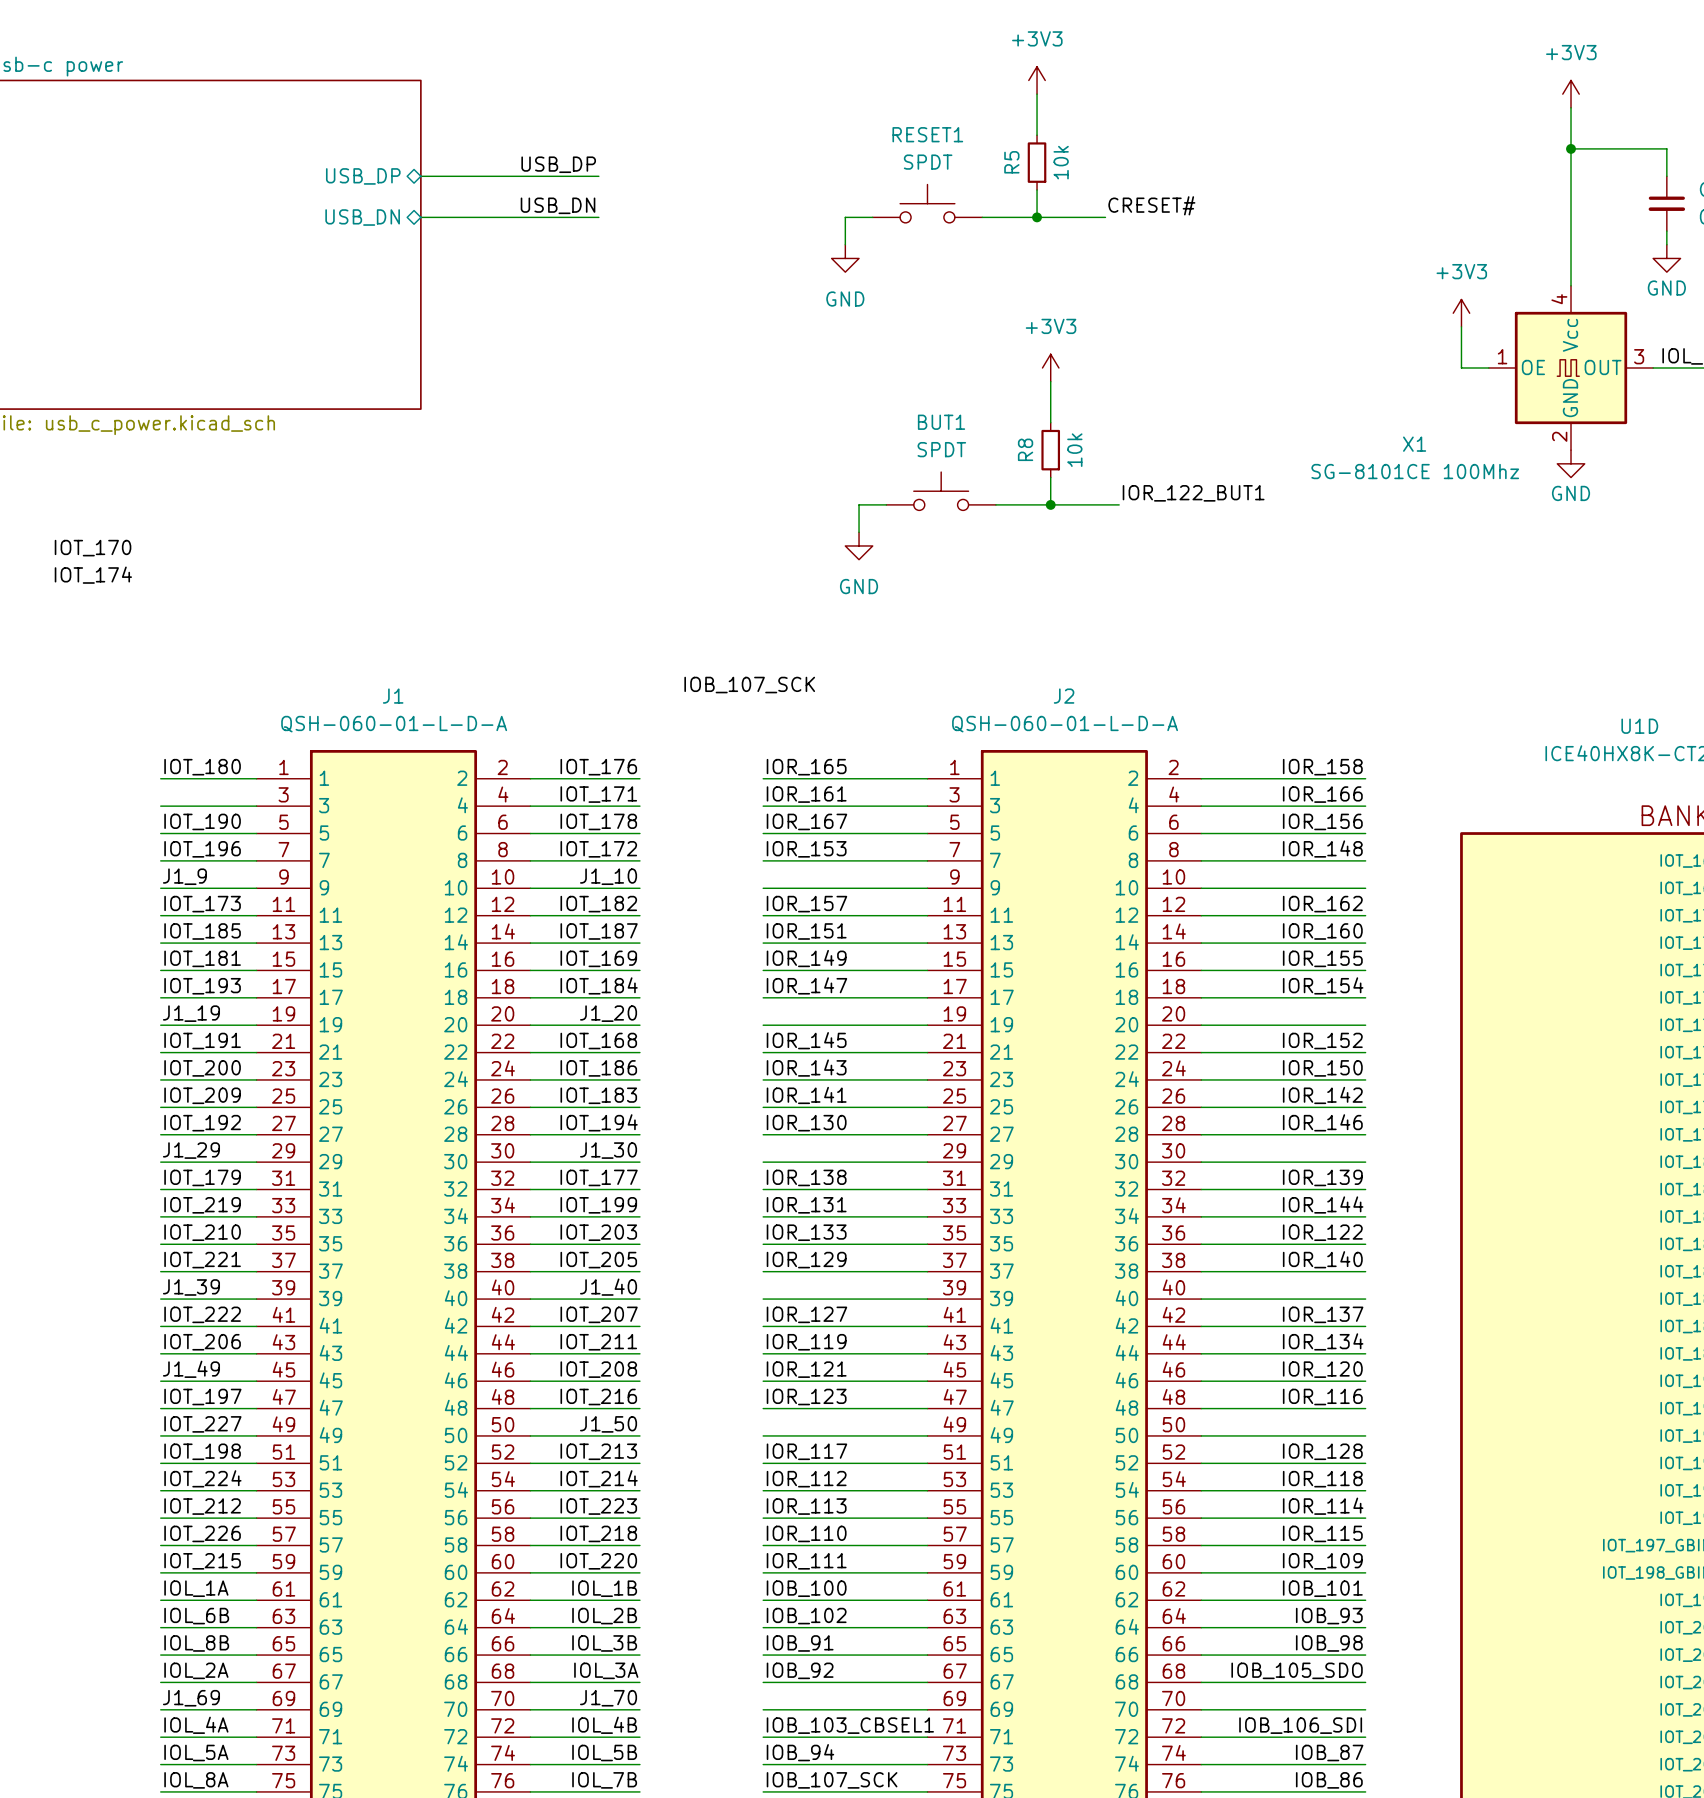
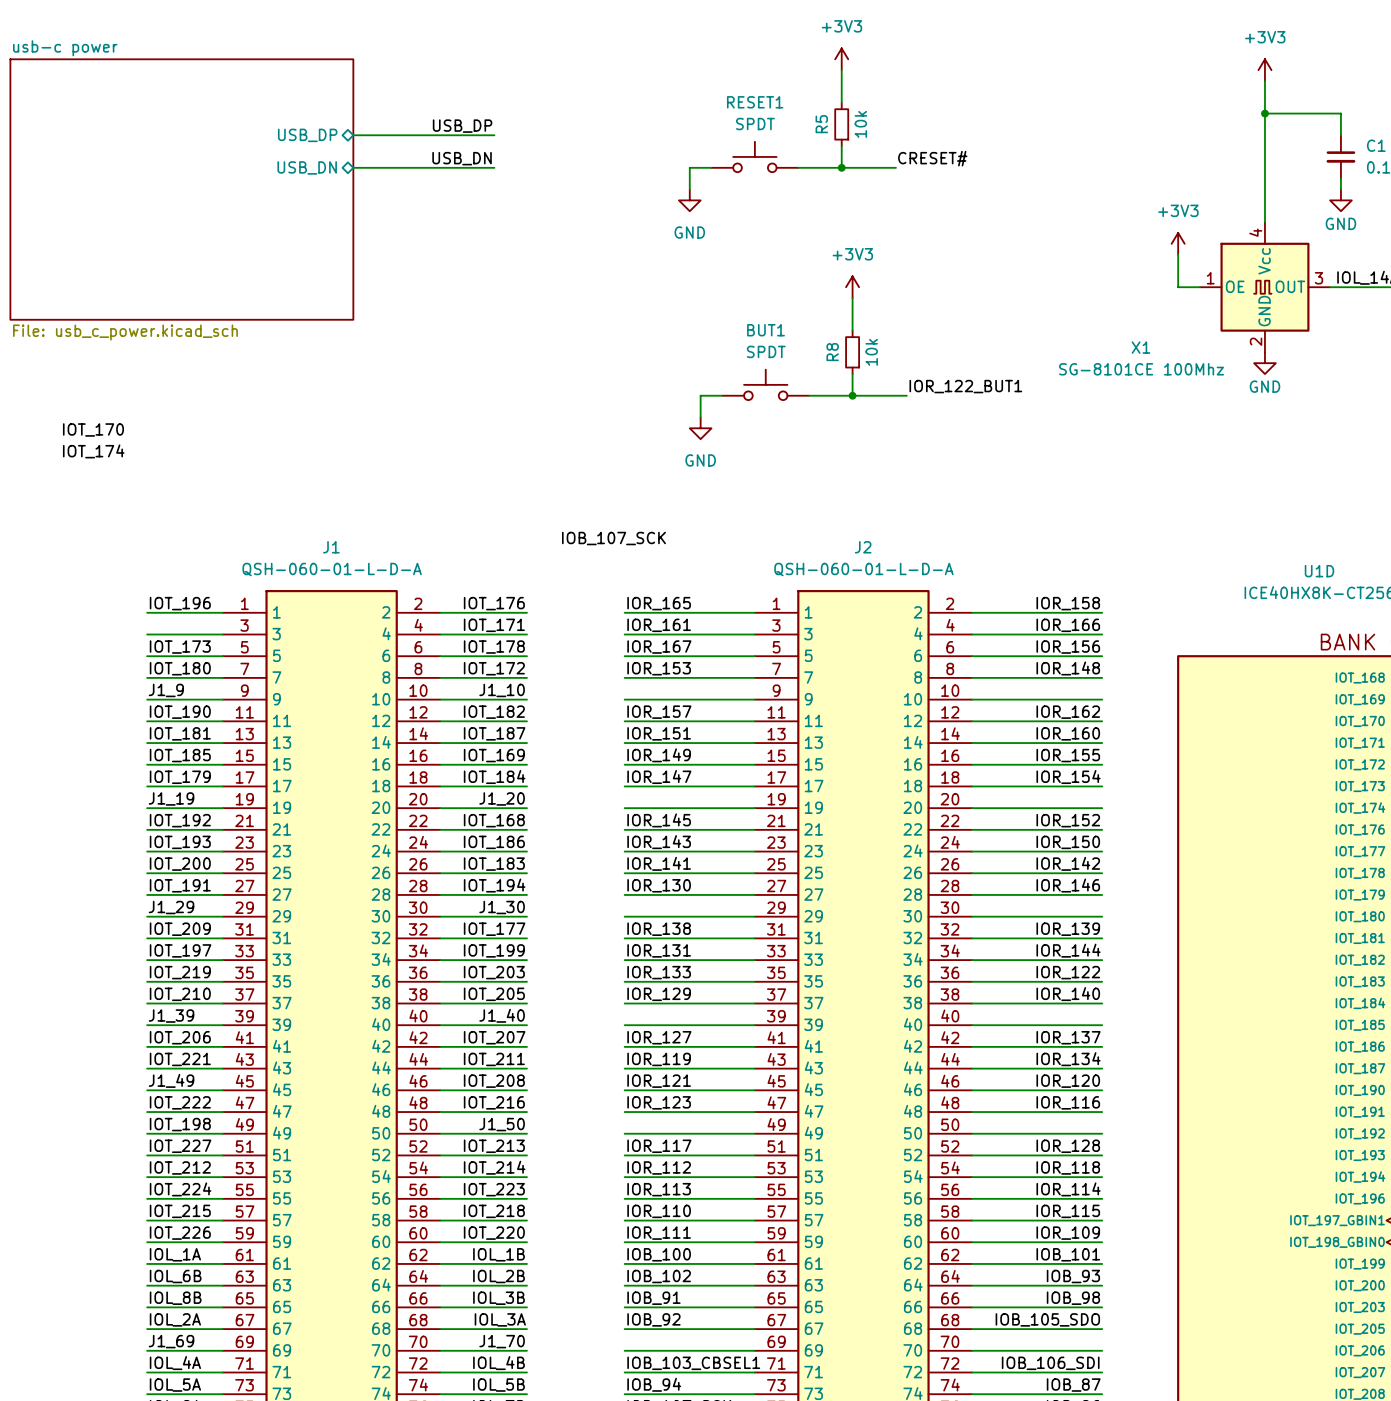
label: IOT_180 (202, 767) -> IOT_196 (180, 603)
label: IOT_190 (202, 821) -> IOT_173 (180, 647)
label: IOT_196 (202, 849) -> IOT_180 (180, 668)
label: IOT_173 (202, 904) -> IOT_190 (180, 712)
label: IOT_185 (202, 931) -> IOT_181 (180, 733)
label: IOT_181 (202, 958) -> IOT_185 (180, 755)
label: IOT_193 (202, 986) -> IOT_179 (180, 777)
label: IOT_191 (202, 1041) -> IOT_192 (180, 820)
label: IOT_200 (202, 1068) -> IOT_193 (180, 842)
label: IOT_209 (202, 1095) -> IOT_200 (180, 864)
label: IOT_192 (202, 1123) -> IOT_191 (180, 885)
label: IOT_179 (202, 1177) -> IOT_209 (180, 929)
label: IOT_219 (202, 1205) -> IOT_197 (180, 950)
label: IOT_210 (202, 1232) -> IOT_219 (180, 972)
label: IOT_221 (202, 1260) -> IOT_210 (180, 994)
label: IOT_222 (202, 1314) -> IOT_206 (180, 1037)
label: IOT_206 (202, 1342) -> IOT_221 (180, 1059)
label: IOT_197 (202, 1397) -> IOT_222 (180, 1102)
label: IOT_227 (202, 1424) -> IOT_198 (180, 1124)
label: IOT_198 (202, 1451) -> IOT_227 (180, 1146)
label: IOT_224 (202, 1478) -> IOT_212 (180, 1167)
label: IOT_212 (202, 1506) -> IOT_224 (180, 1189)
label: IOT_226 (202, 1533) -> IOT_215 (180, 1211)
label: IOT_215 (202, 1561) -> IOT_226 (180, 1233)

